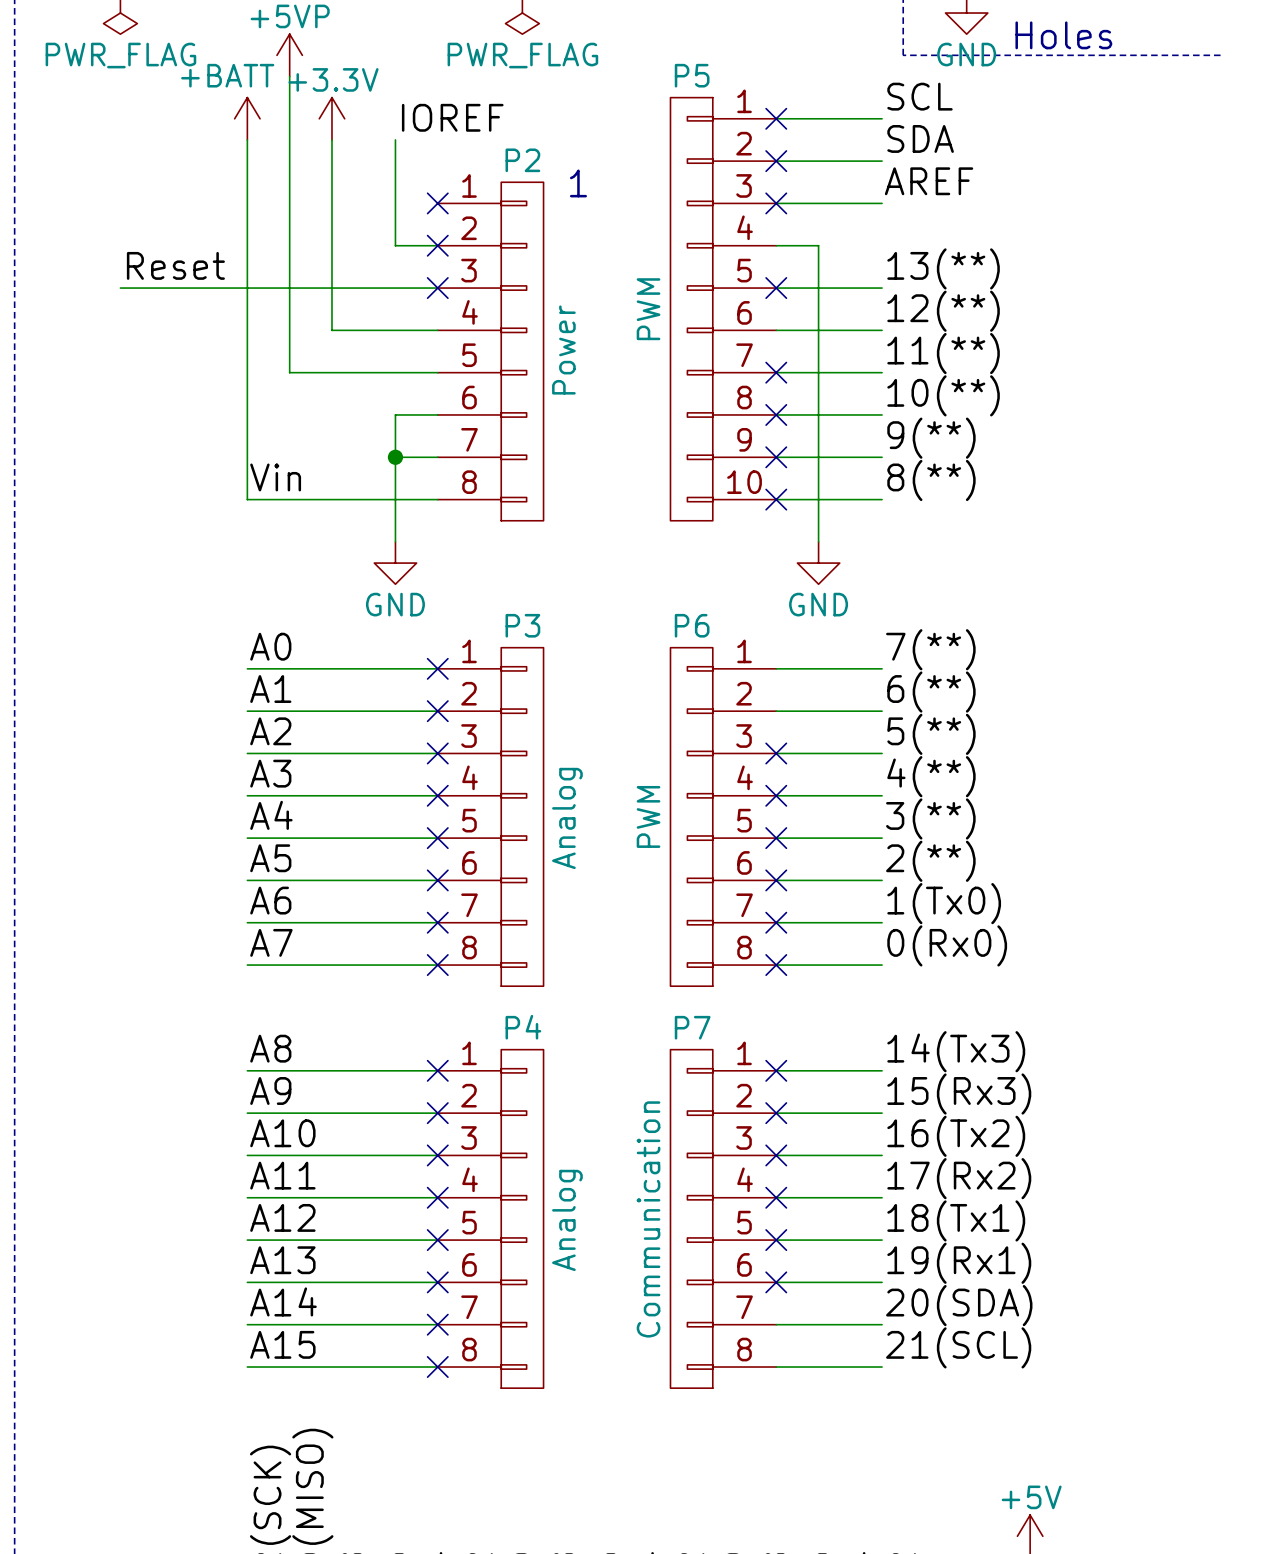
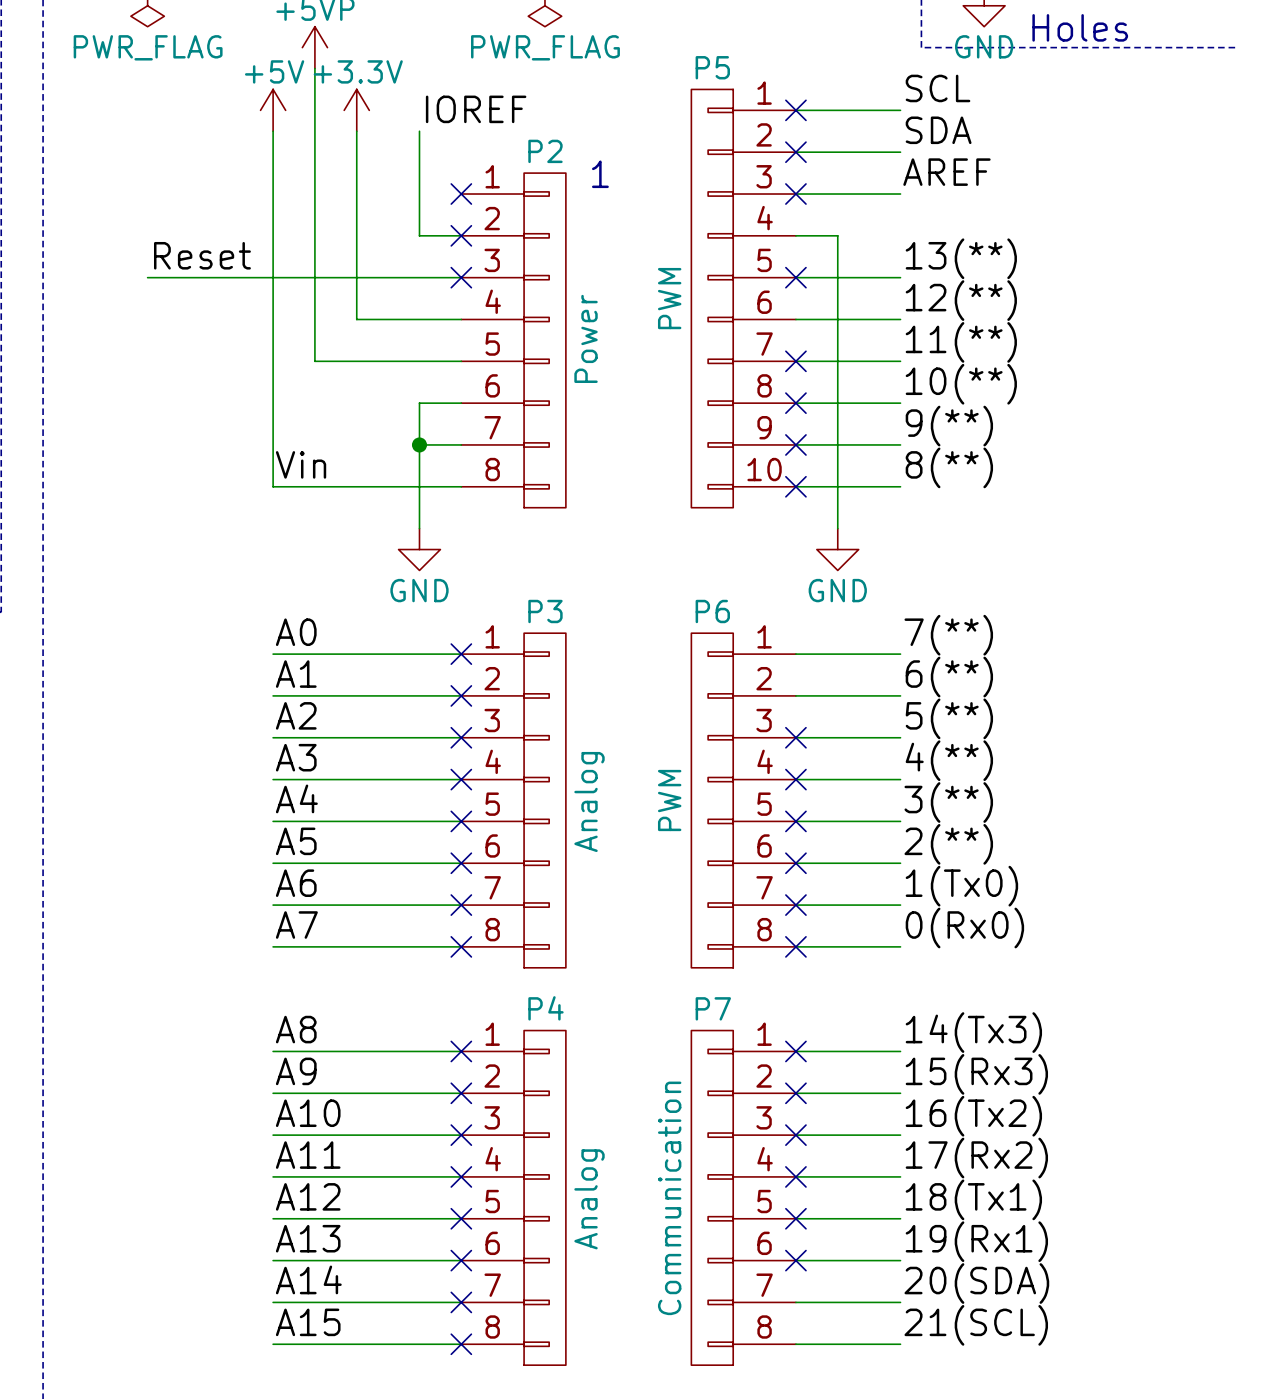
power symbol: +BATT (247, 118) -> +5V (273, 110)

